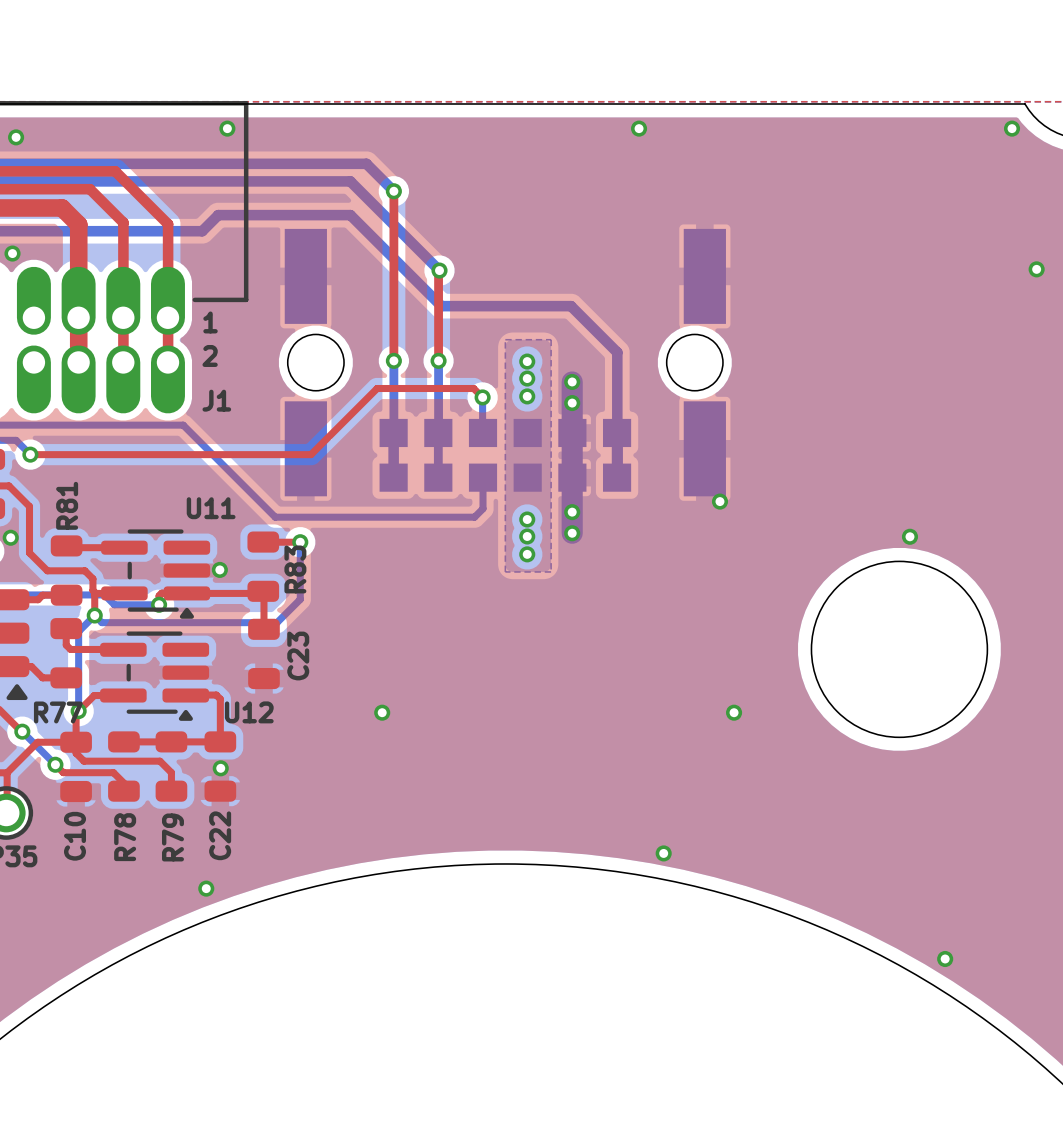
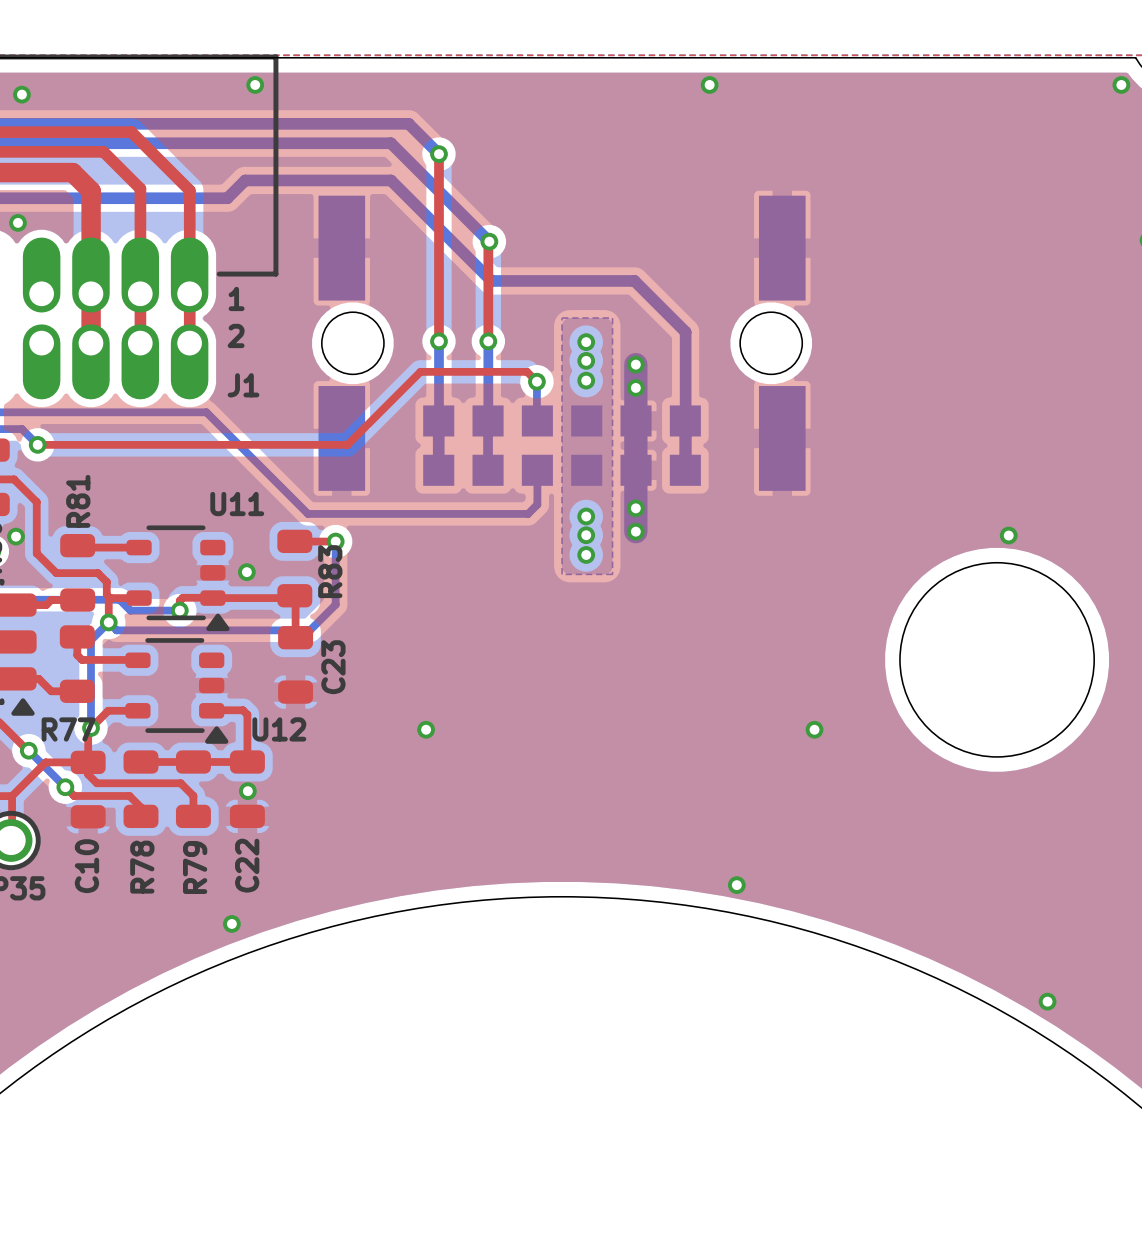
via: (719, 501) -> none
U11 footprint: [101, 529, 211, 619] -> [126, 525, 230, 632]
U12 footprint: [100, 631, 210, 721] -> [125, 638, 229, 744]

